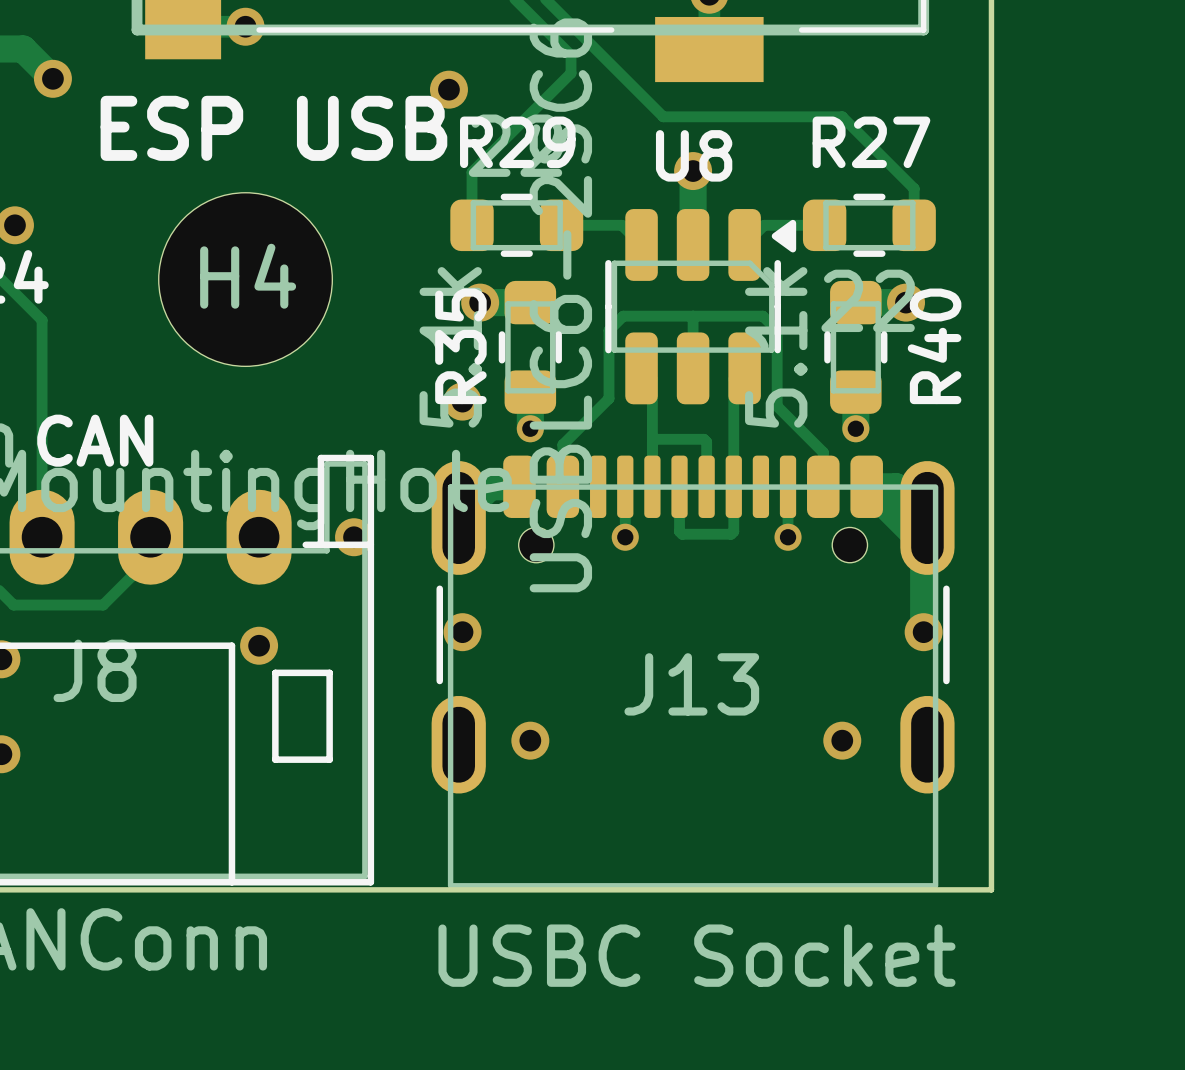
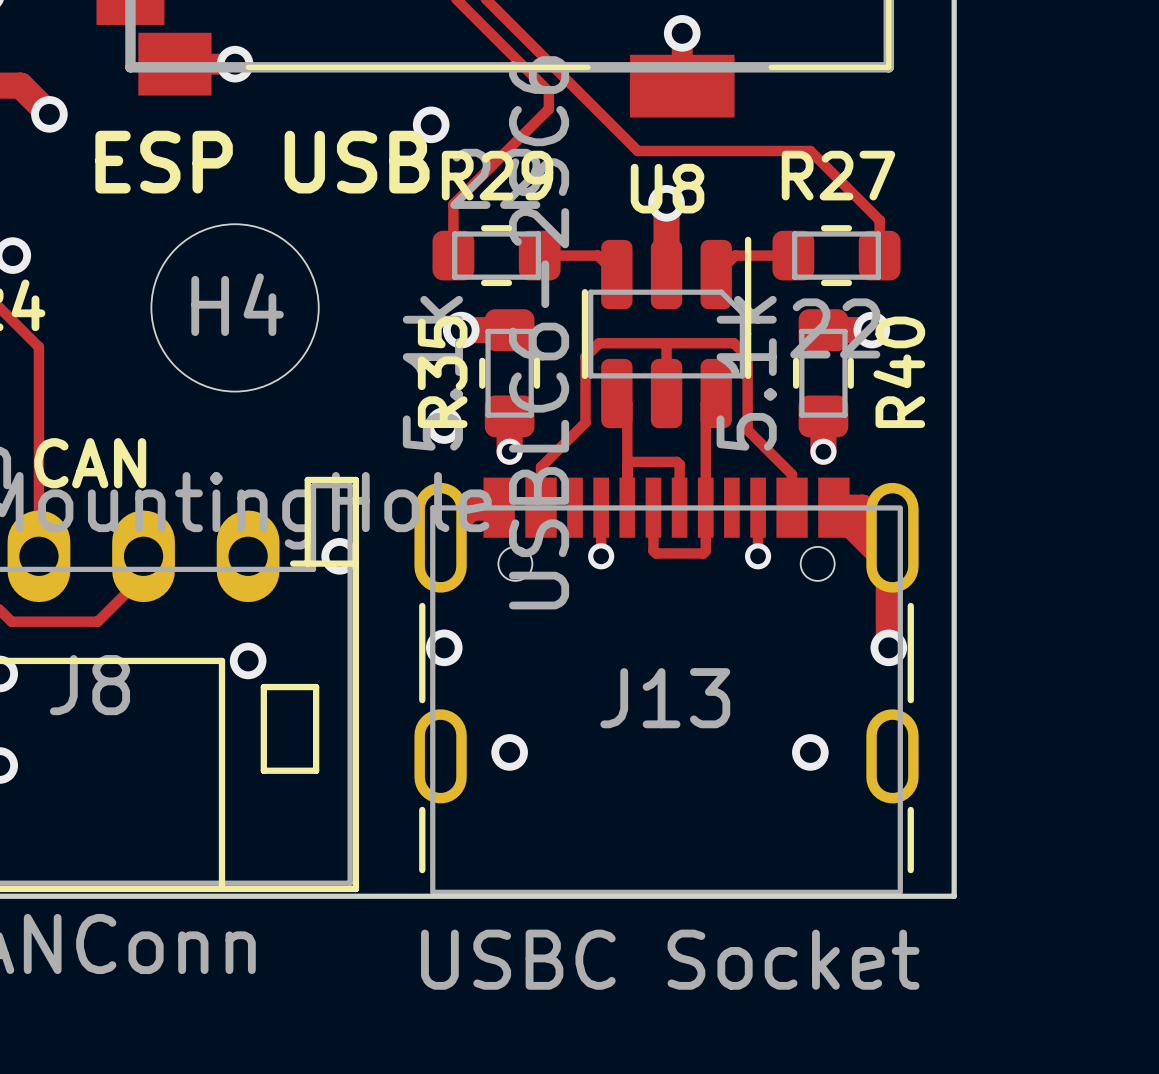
U8 footprint: [605, 209, 797, 405] -> [581, 236, 752, 429]
J13 footprint: [431, 455, 955, 889] -> [414, 477, 919, 895]

